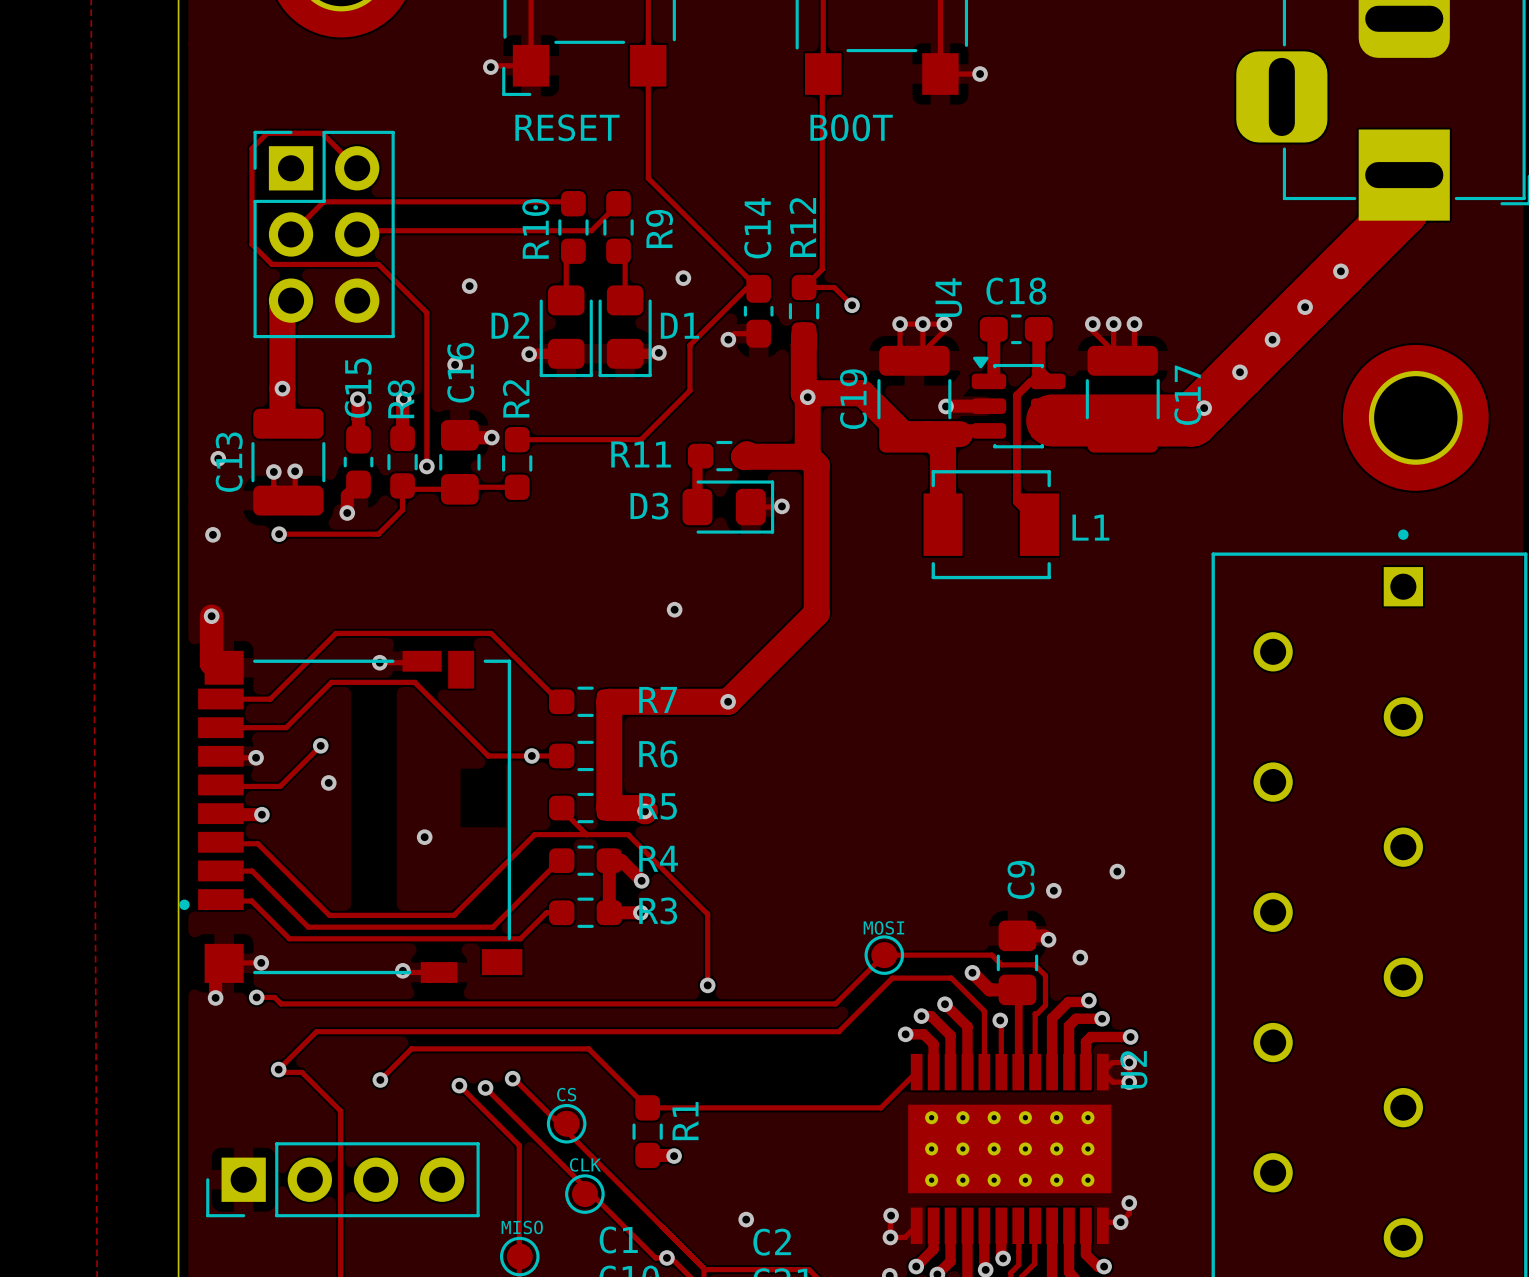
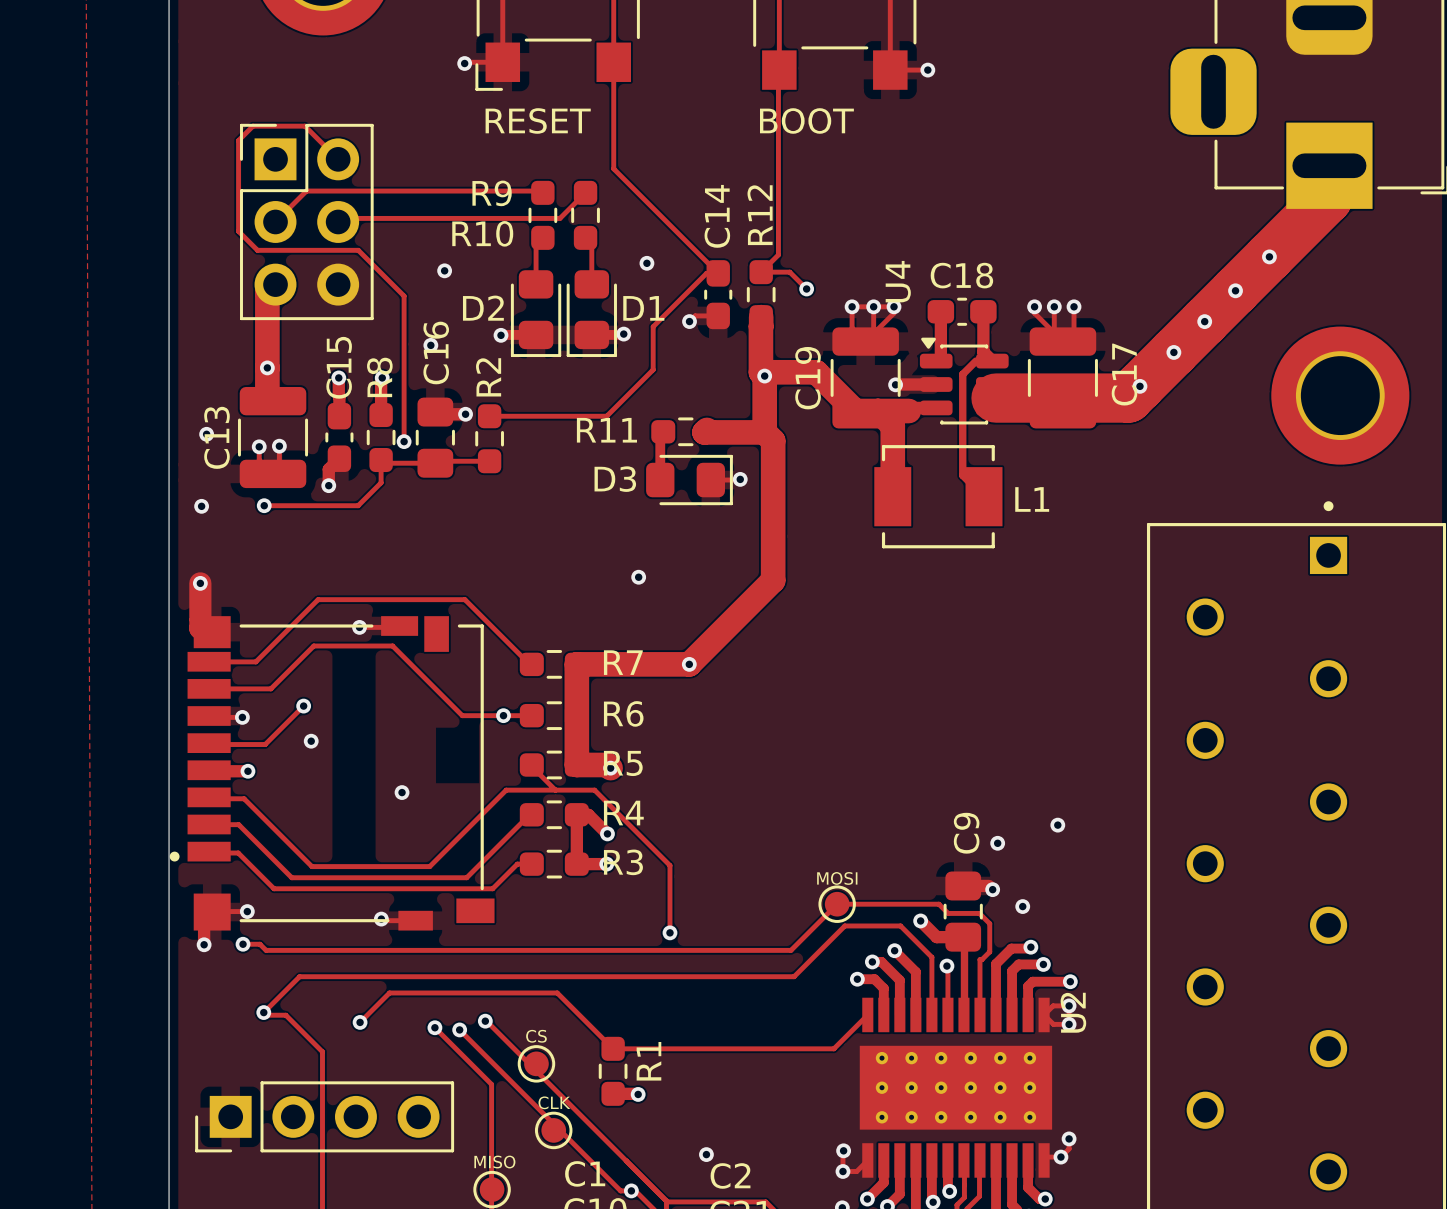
R10 name rotation: 0° (535, 228) -> 90° clockwise (482, 233)
R9 name rotation: 0° (659, 228) -> 90° clockwise (492, 193)
R9 name position: R9 (659, 228) -> R9 (492, 193)

